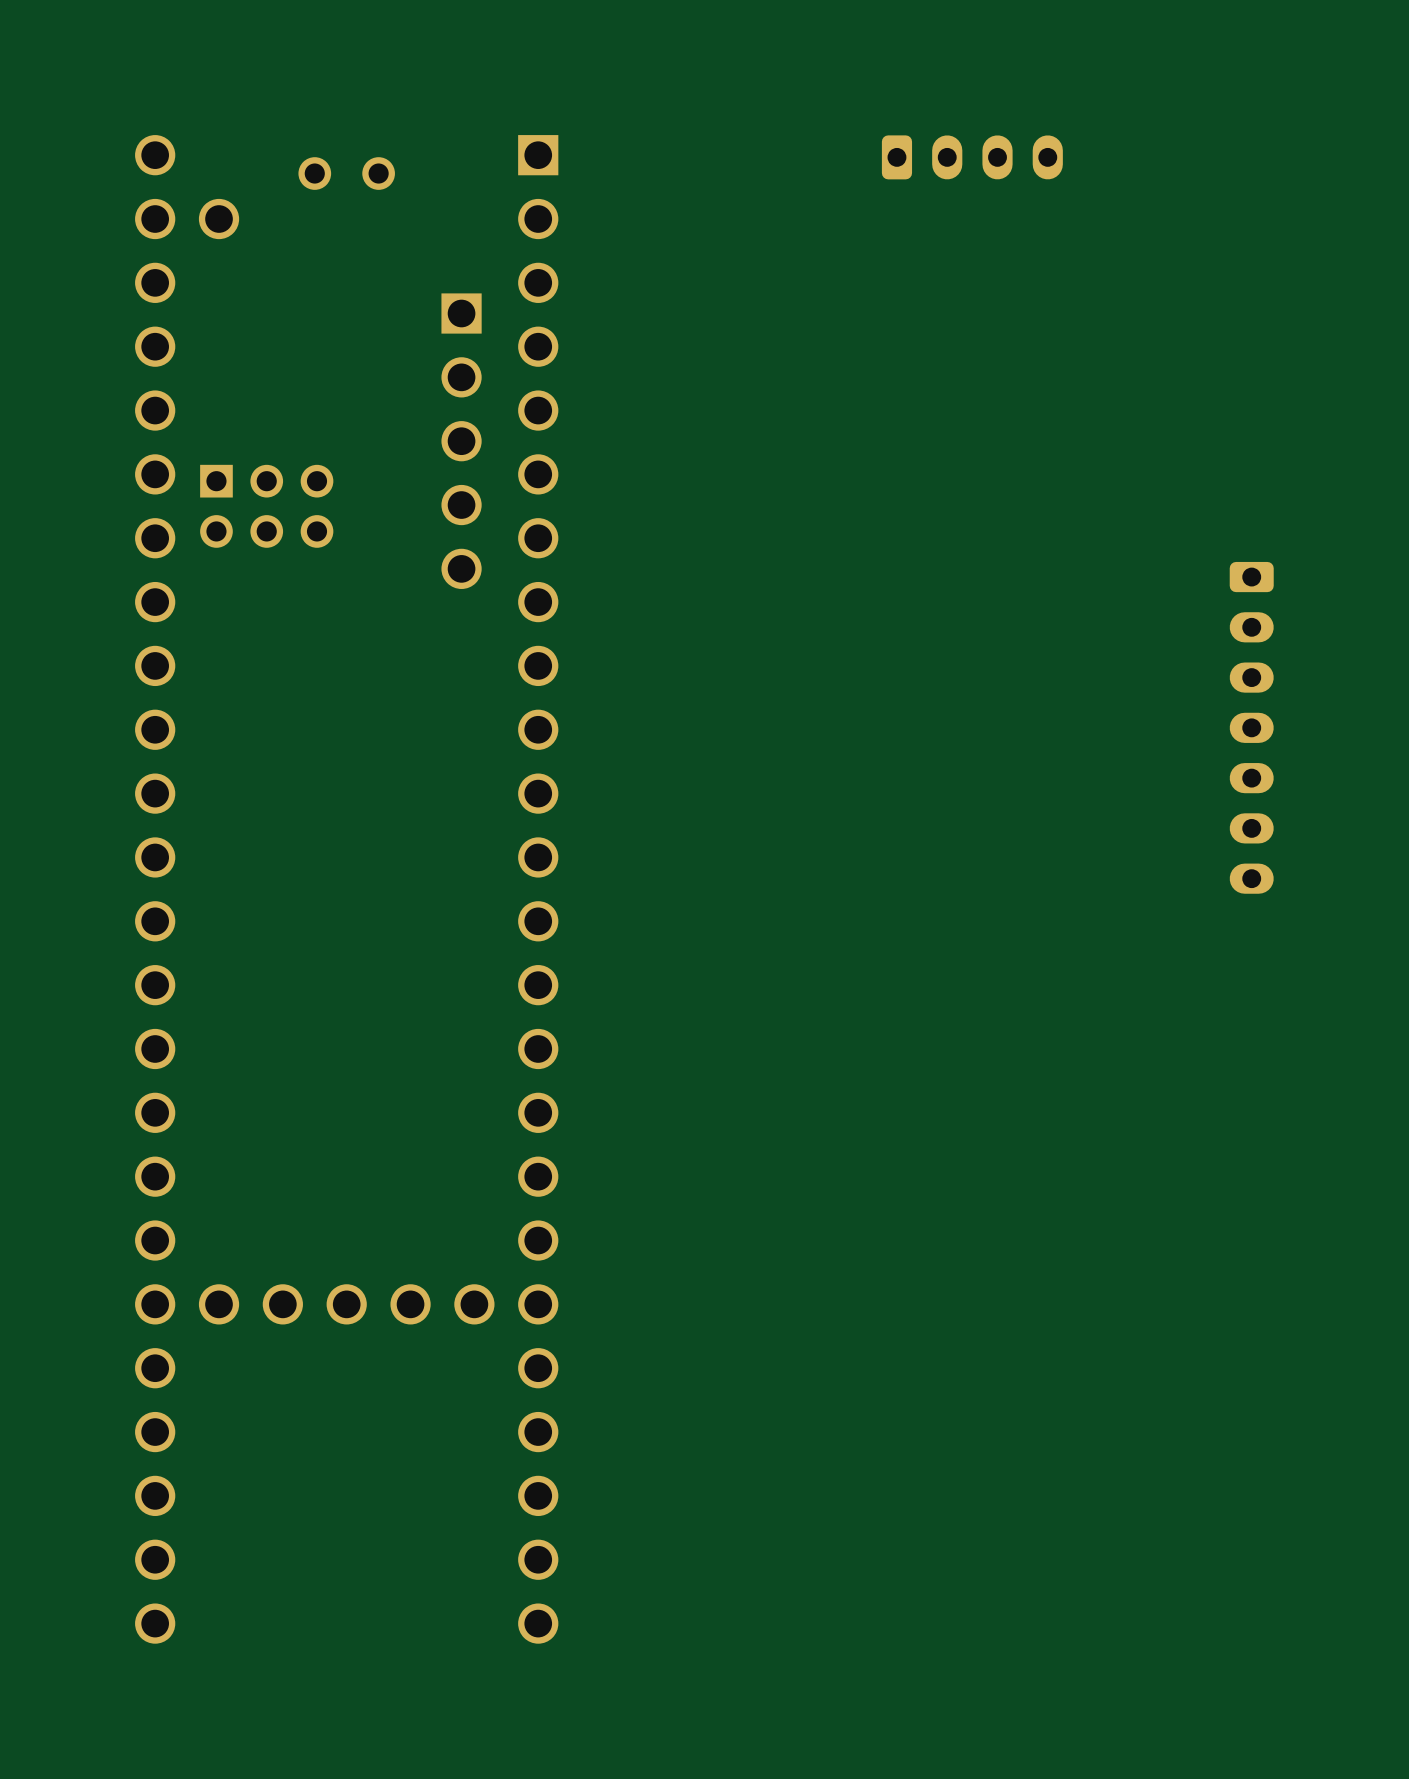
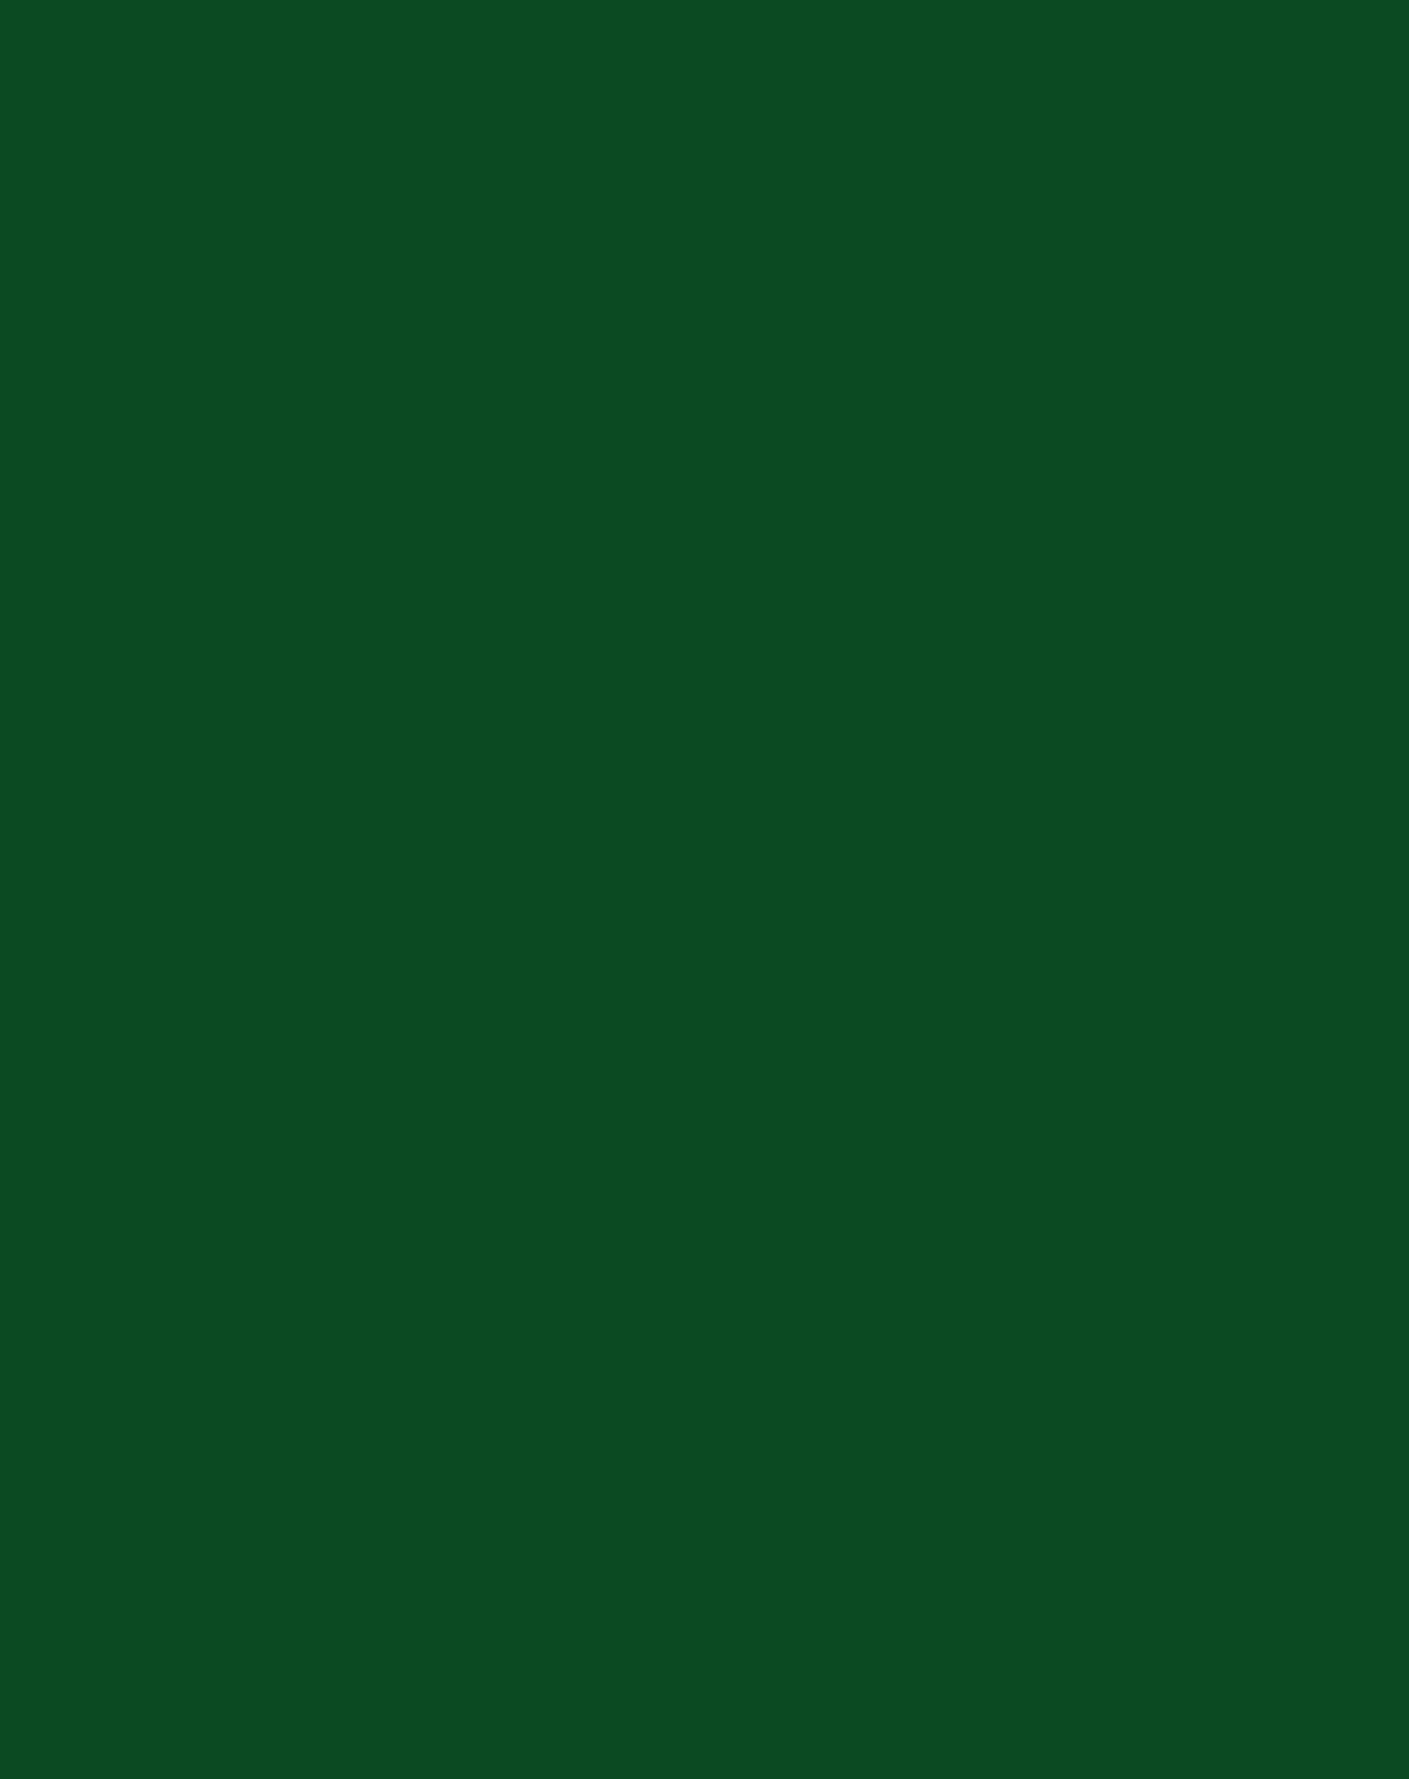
part: (972, 157) -> none
part: (1251, 727) -> none
part: (346, 889) -> none

